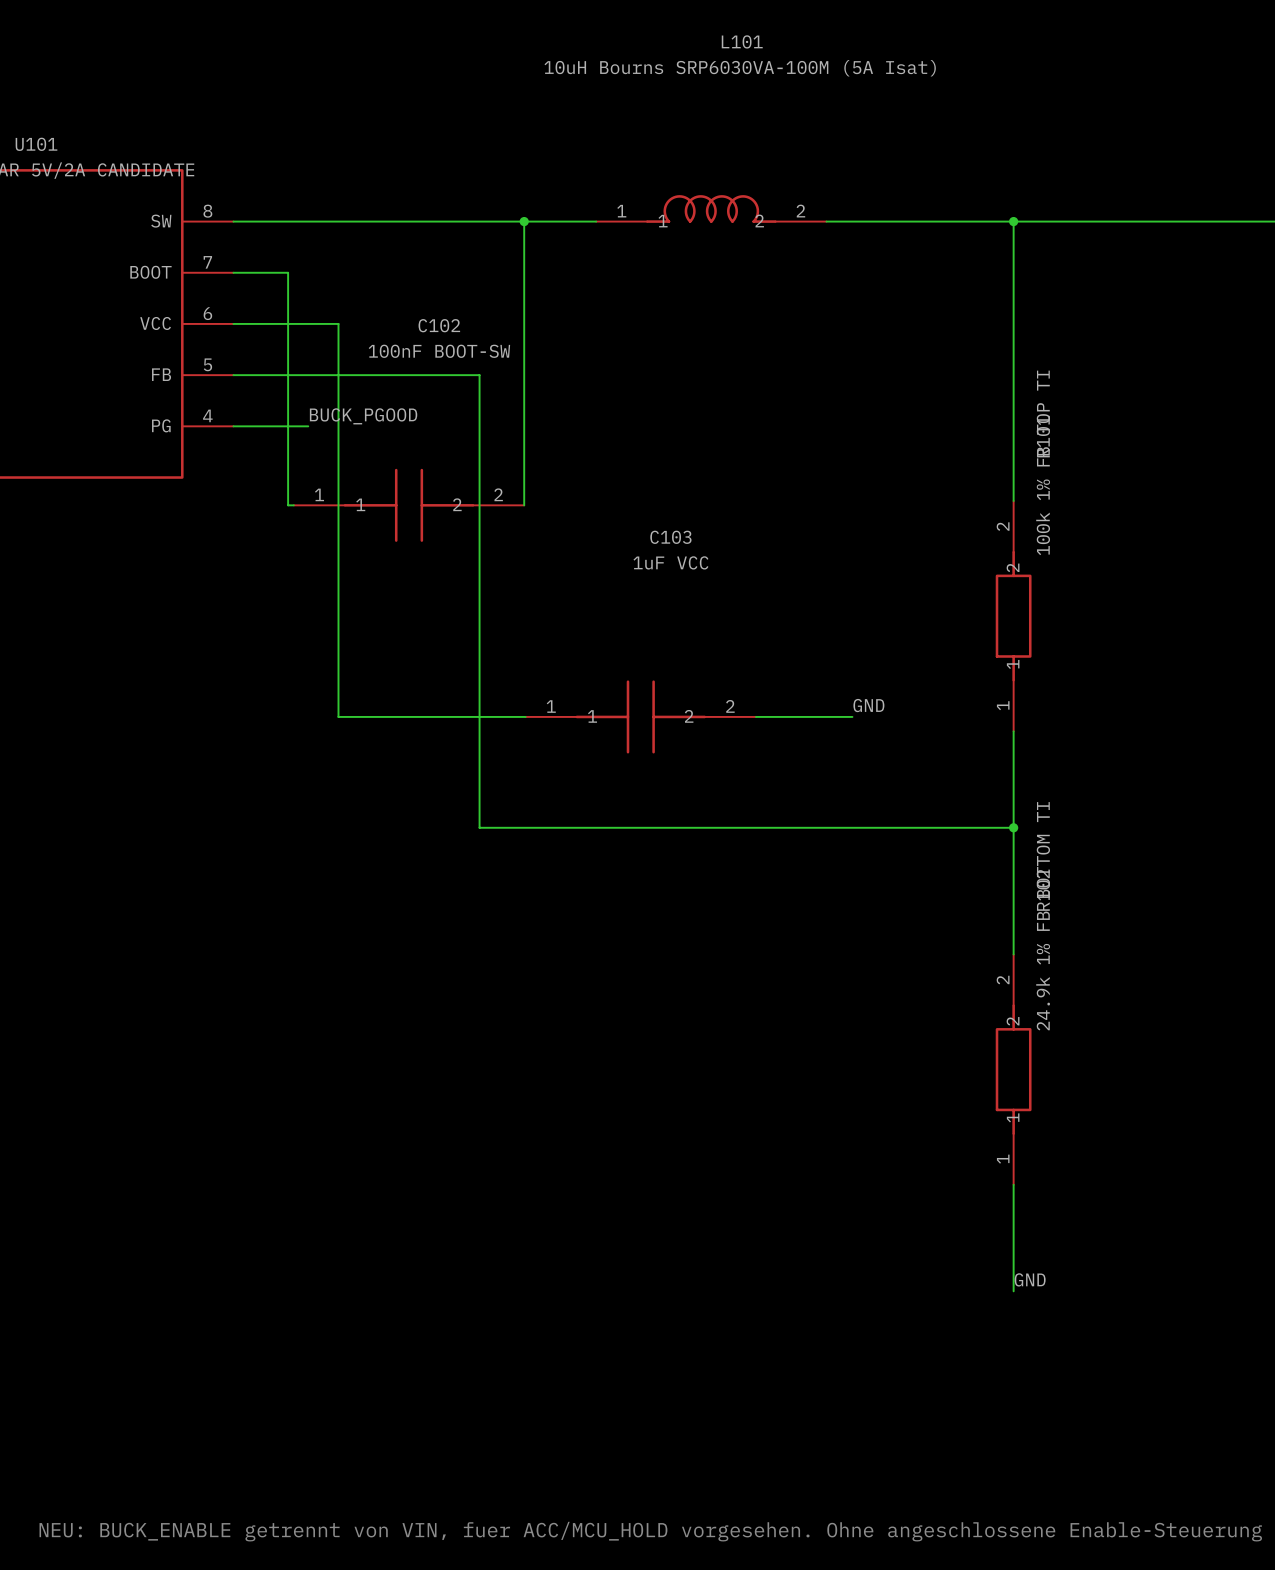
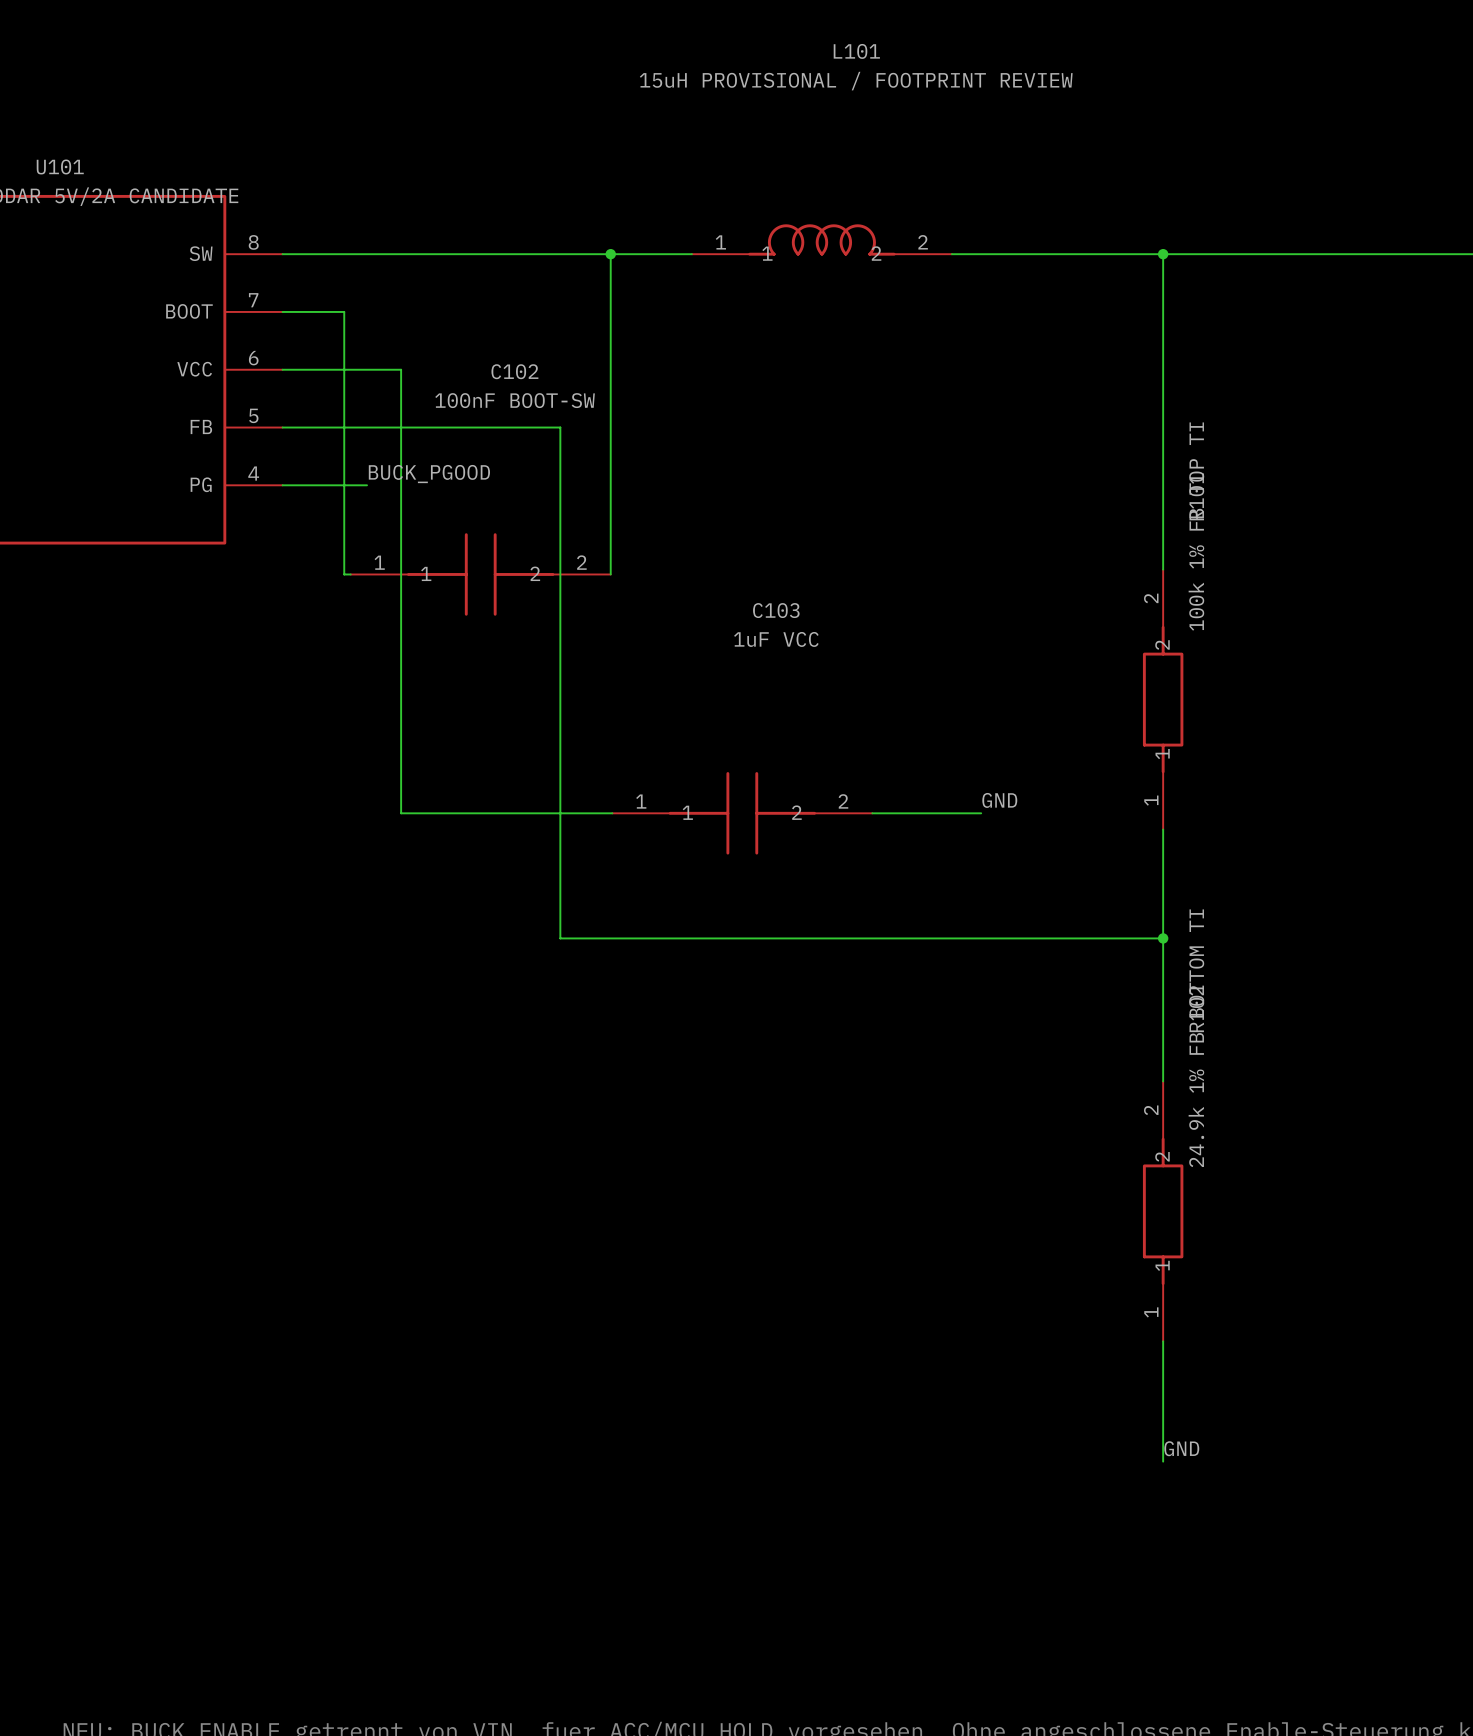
L101 value: 10uH Bourns SRP6030VA-100M (5A Isat) (740, 68) -> 15uH PROVISIONAL / FOOTPRINT REVIEW (856, 81)

